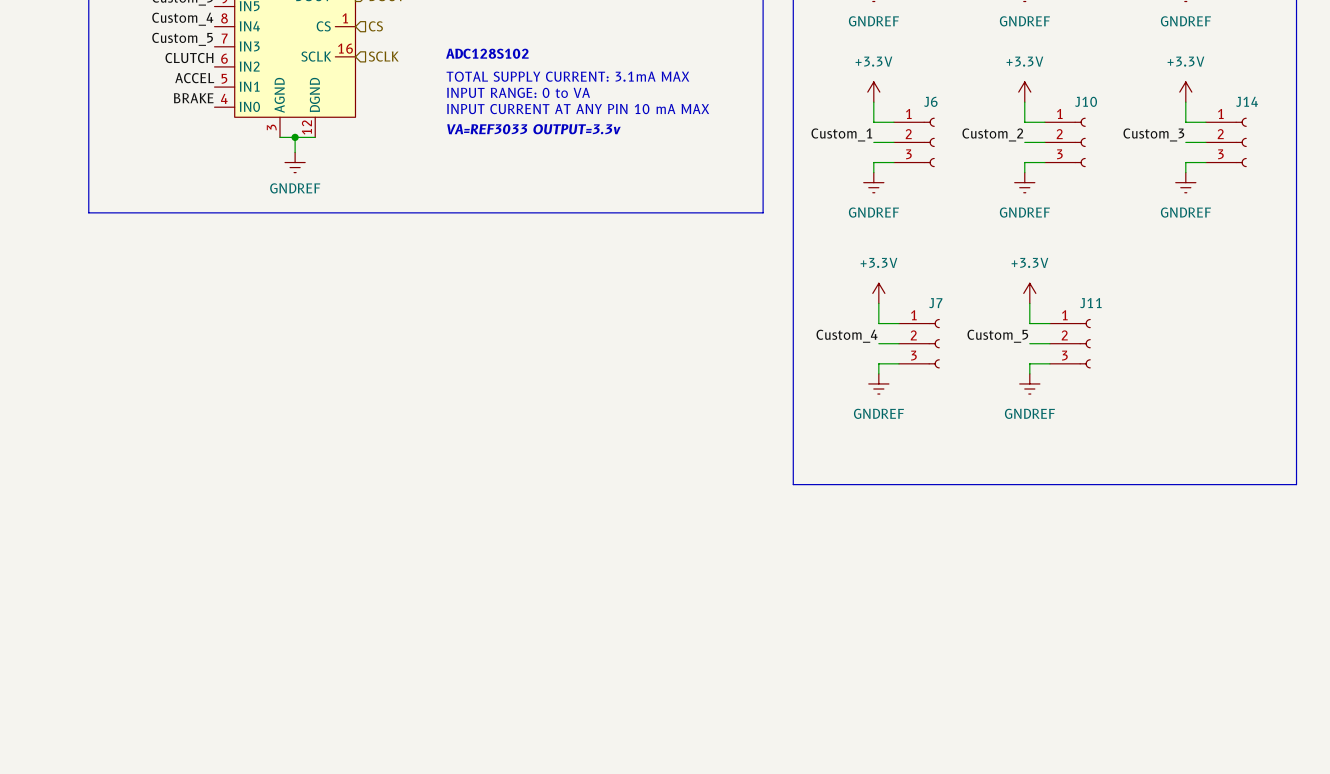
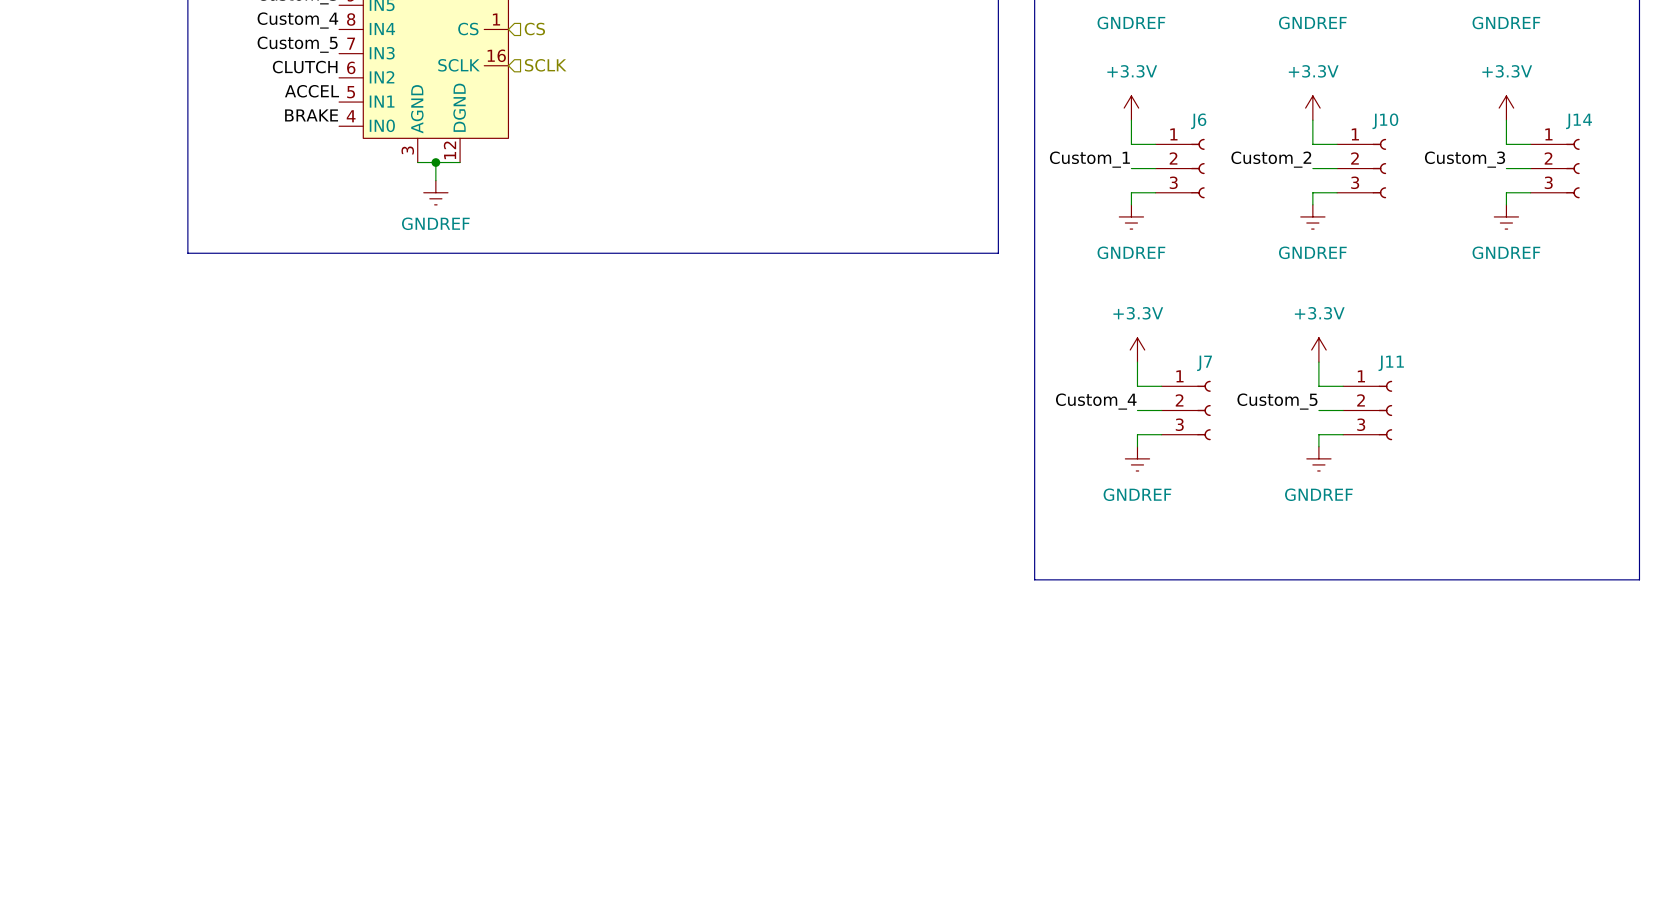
text: ADC128S102 (487, 53) -> none
text: TOTAL SUPPLY CURRENT: 3.1mA MAX (567, 76) -> none
text: INPUT RANGE: 0 to VA (518, 92) -> none
text: INPUT CURRENT AT ANY PIN 10 mA MAX (578, 109) -> none
text: VA=REF3033 OUTPUT=3.3v (533, 129) -> none

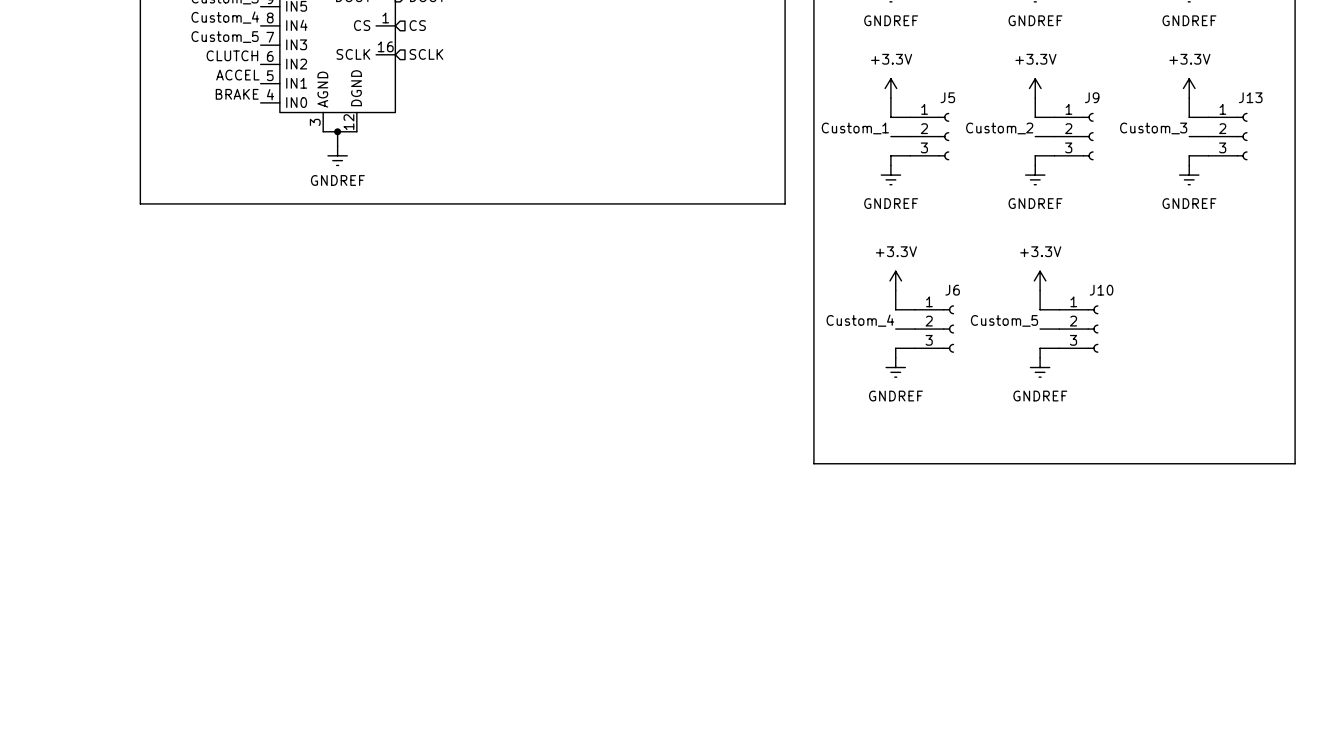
J6 name: J6 (1198, 121) -> J5 (947, 97)
J10 name: J10 (1385, 121) -> J9 (1092, 97)
J14 name: J14 (1579, 121) -> J13 (1250, 97)
J7 name: J7 (1204, 363) -> J6 (952, 290)
J11 name: J11 (1391, 363) -> J10 (1101, 290)

